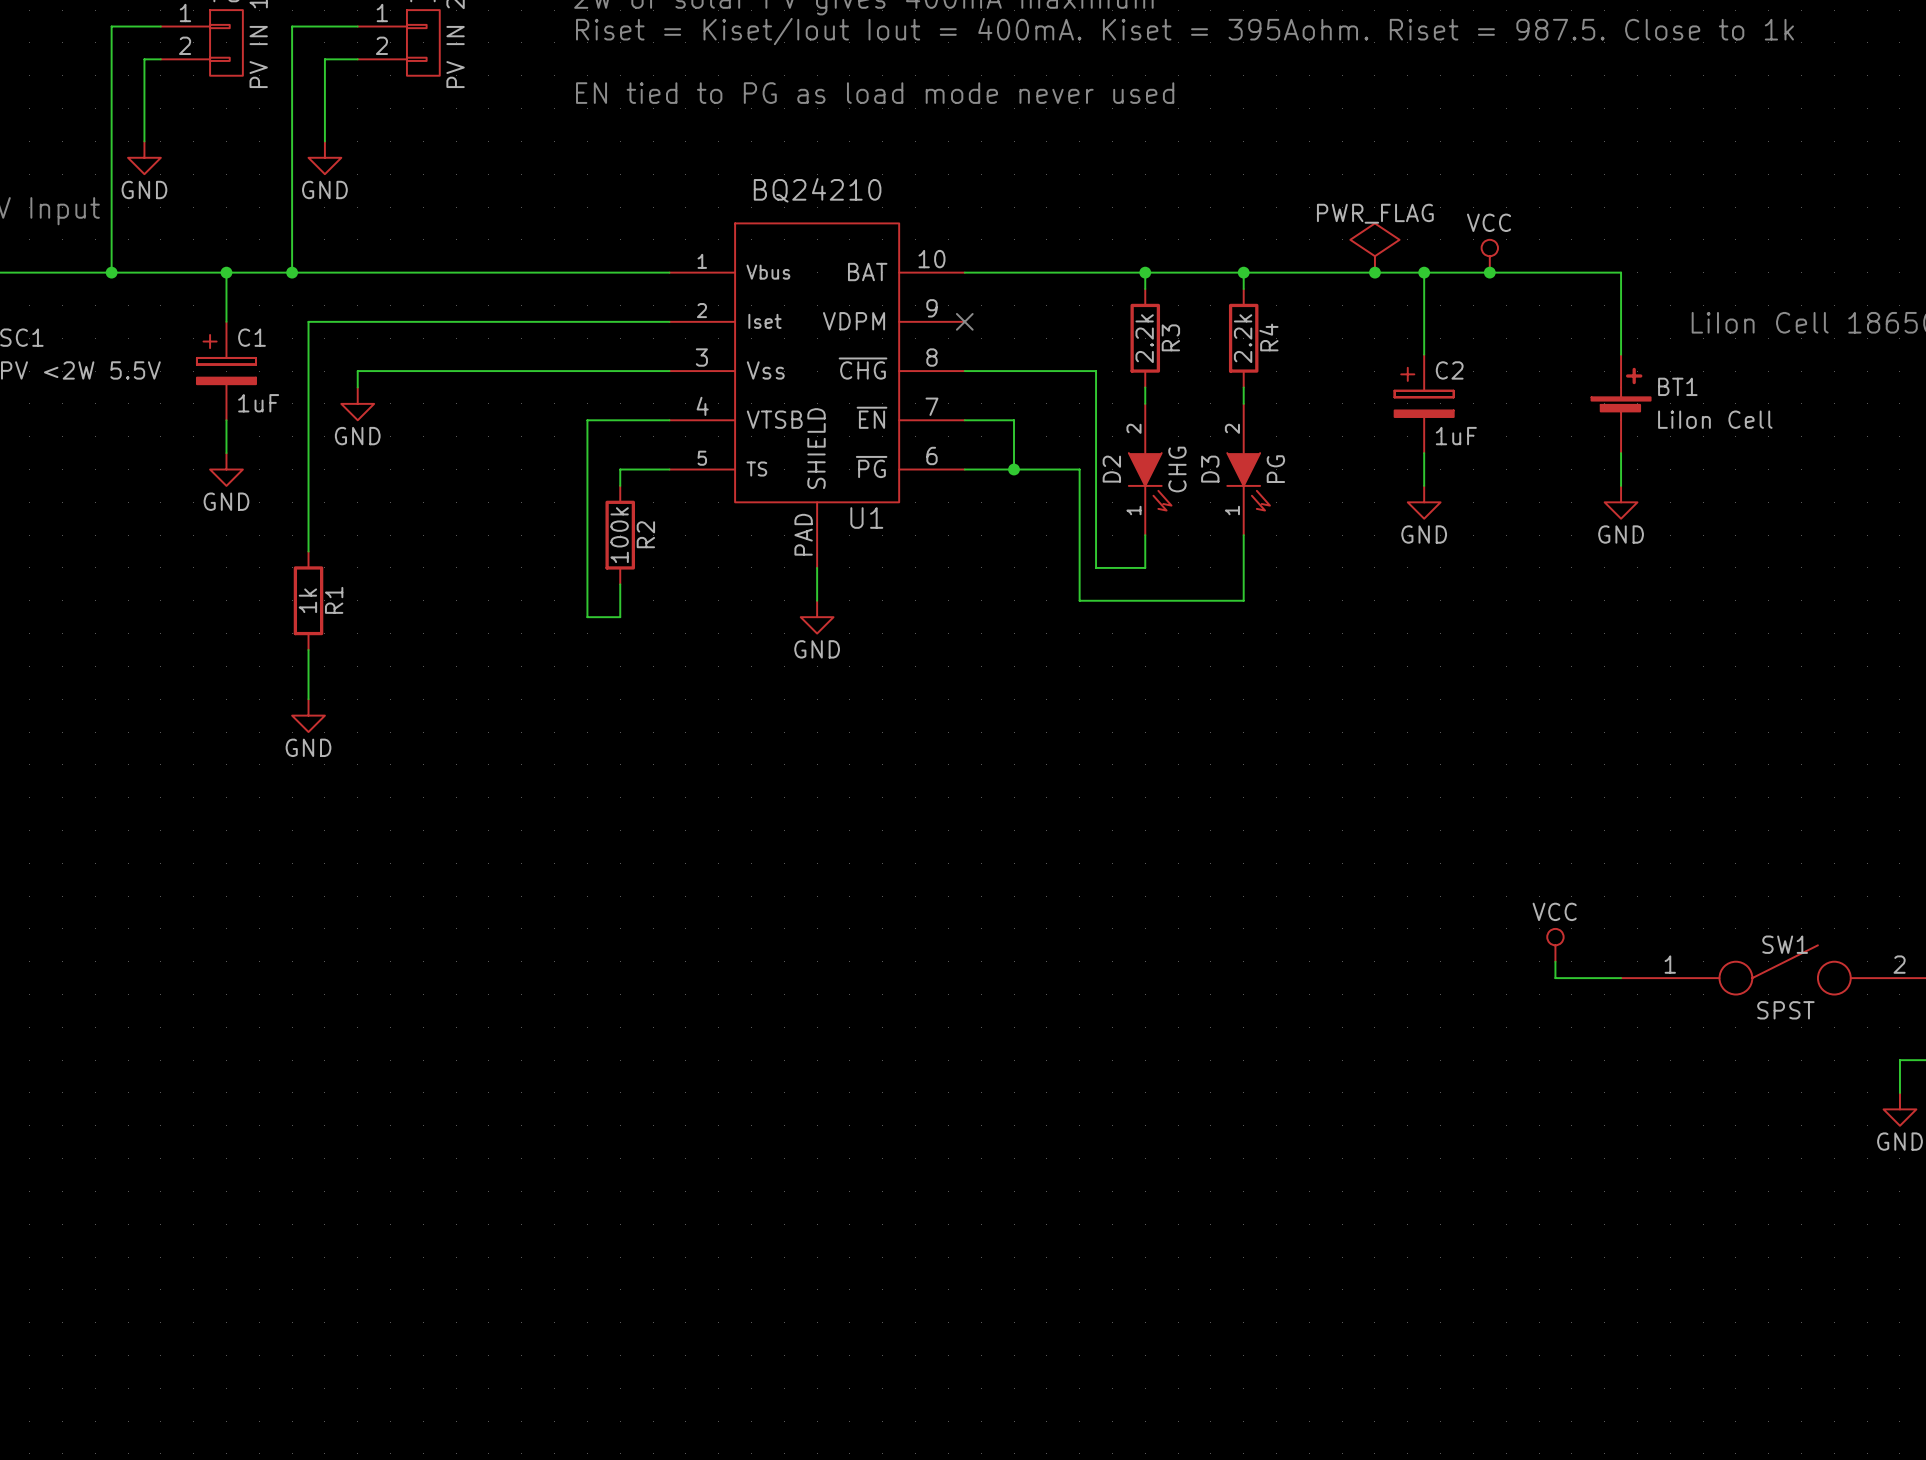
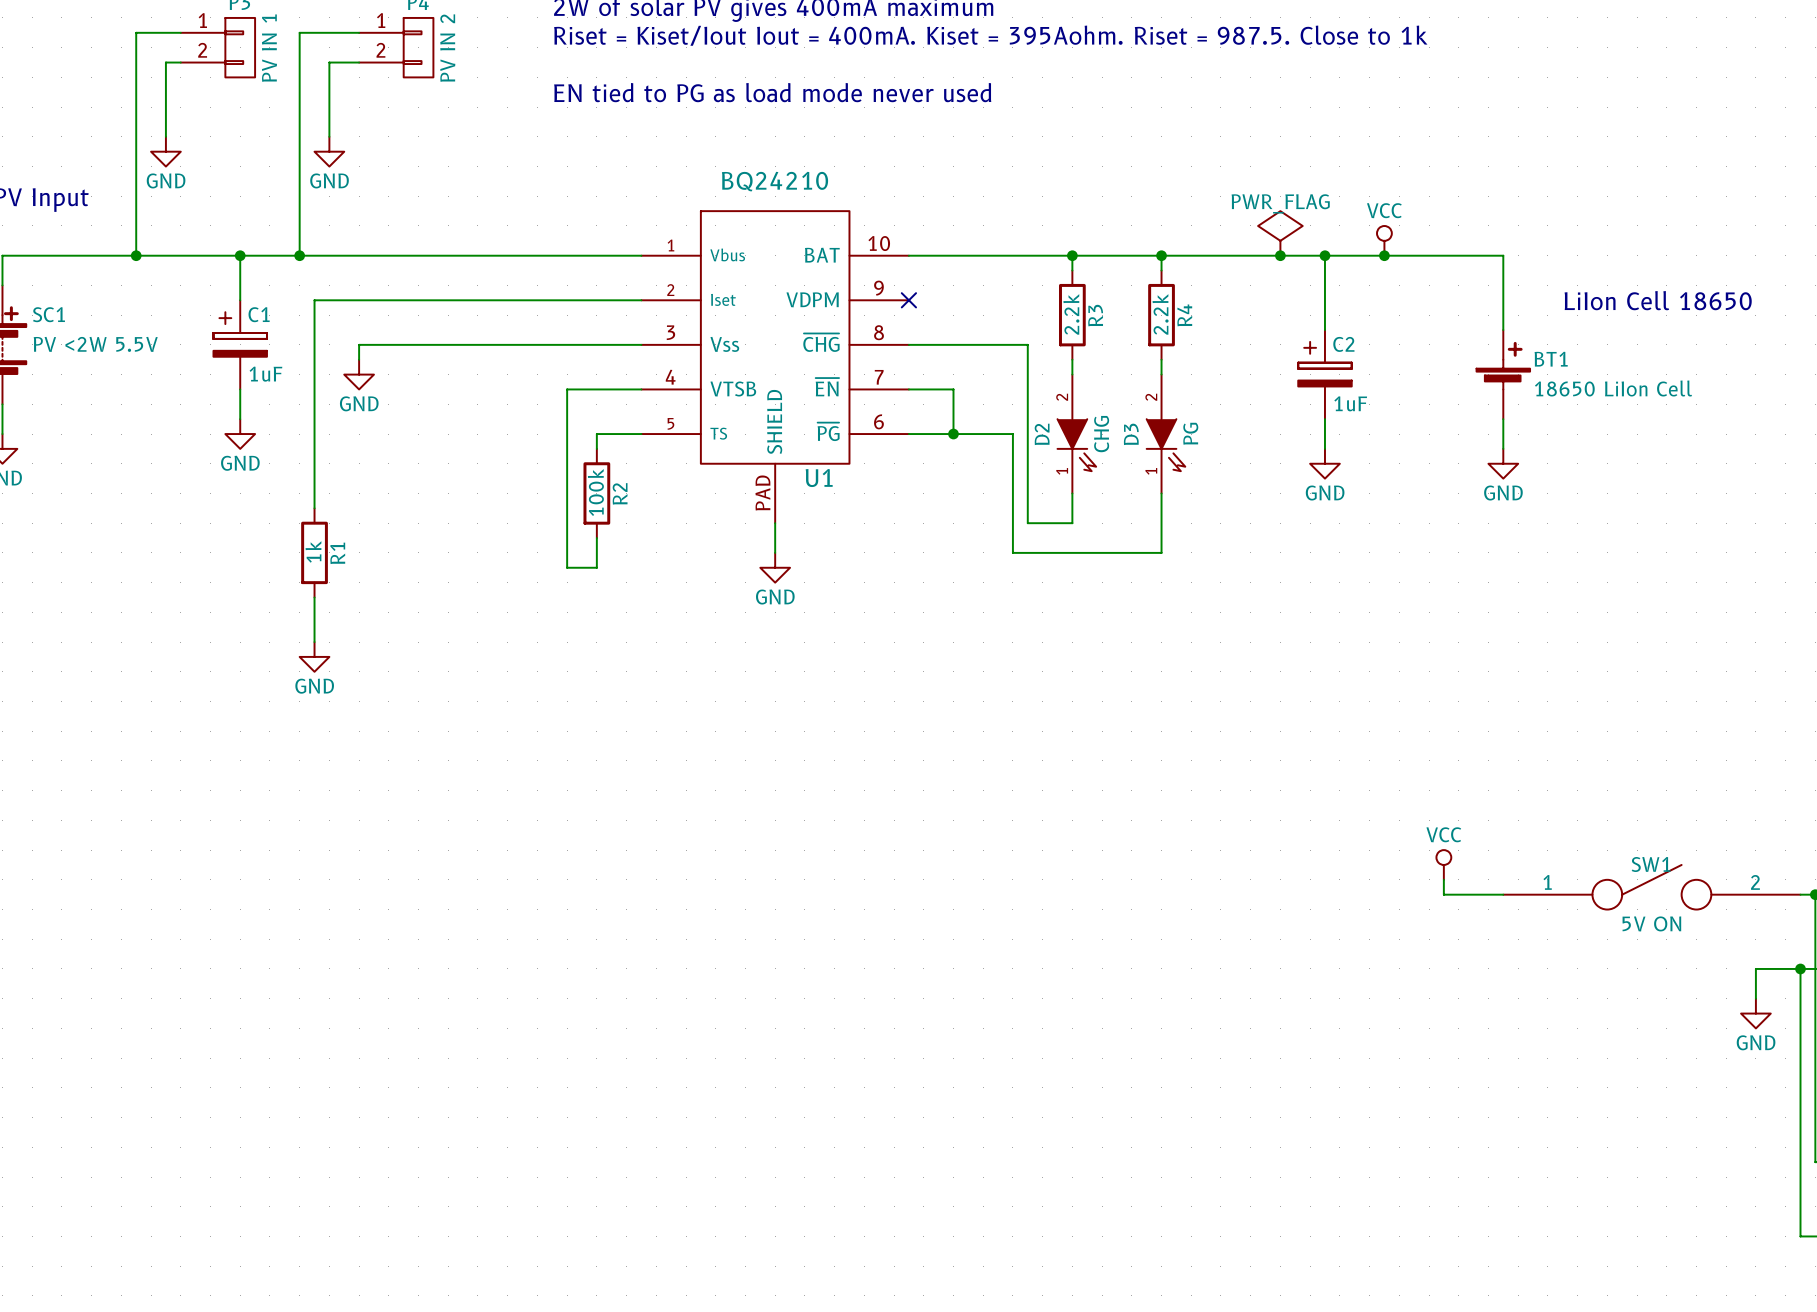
BT1 value: LiIon Cell (1715, 419) -> 18650 LiIon Cell (1613, 388)
SW1 value: SPST (1785, 1010) -> 5V ON (1651, 923)

